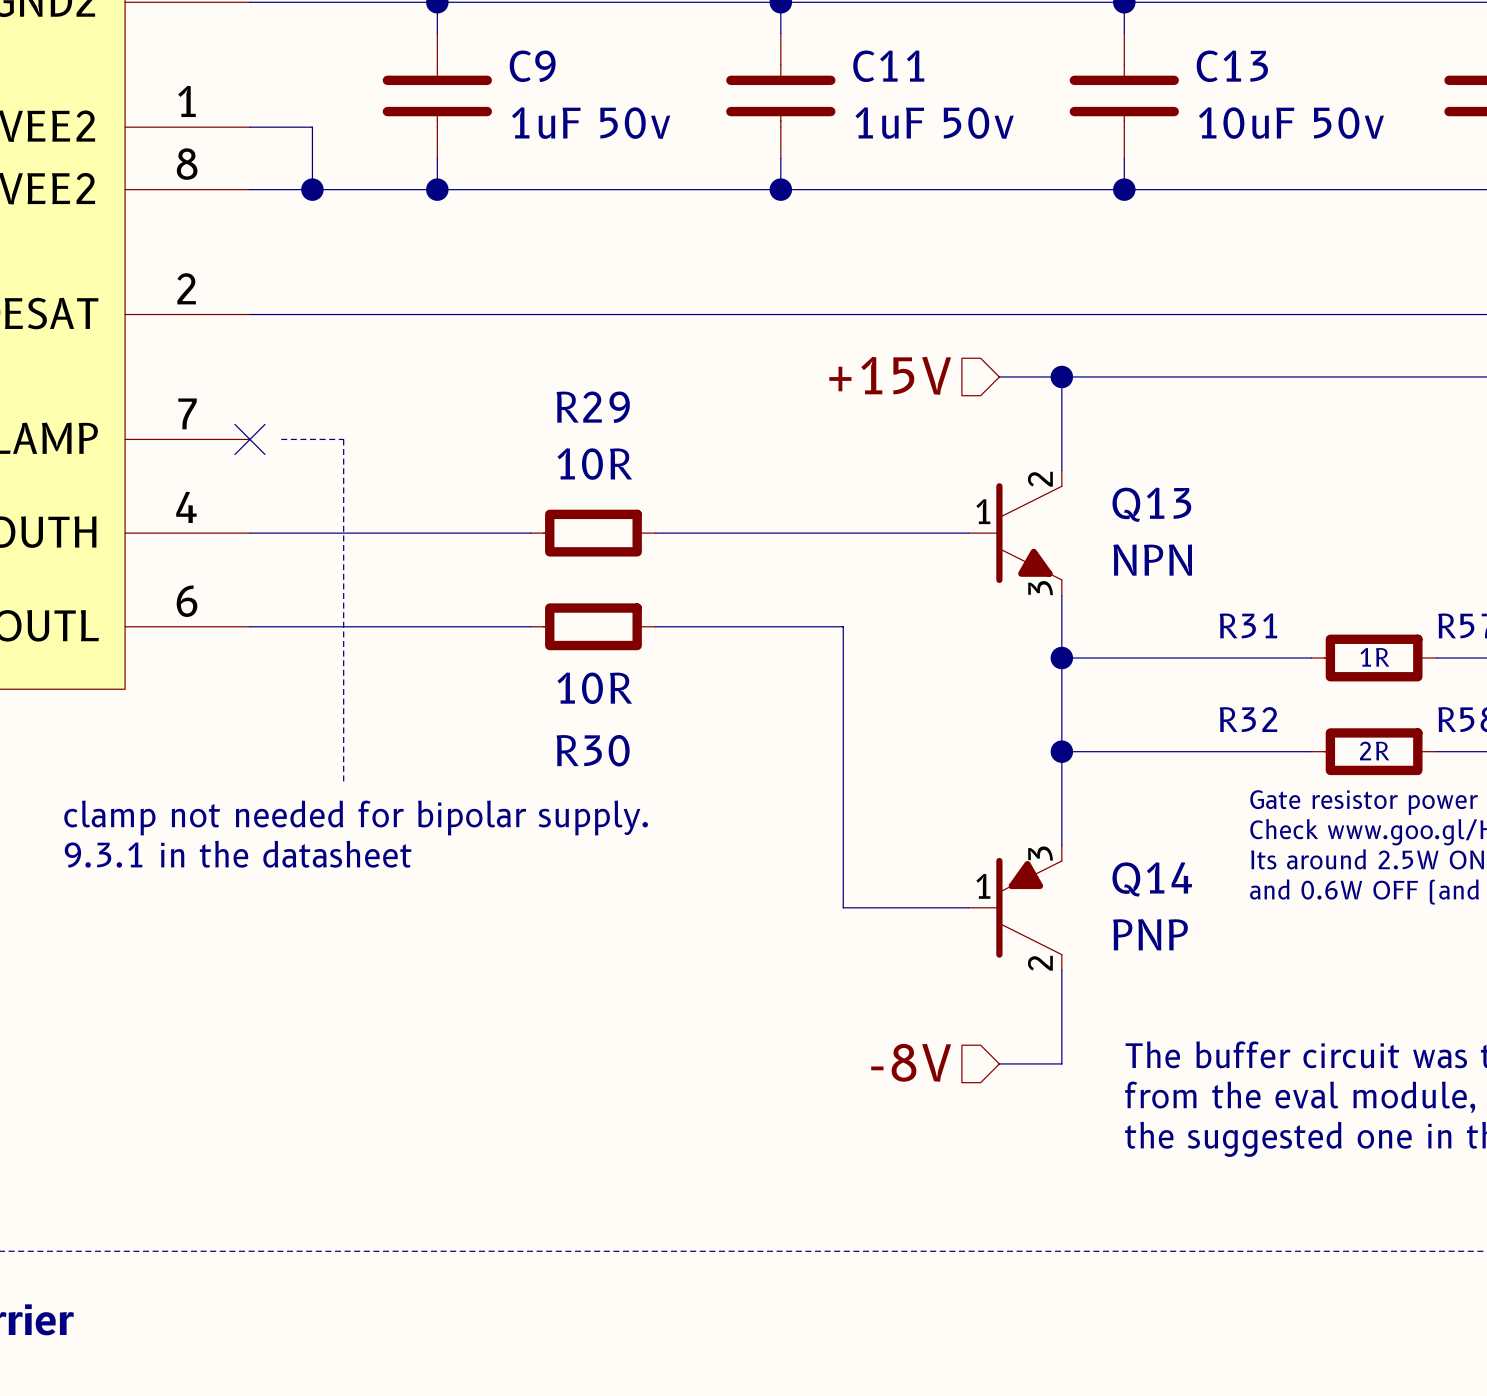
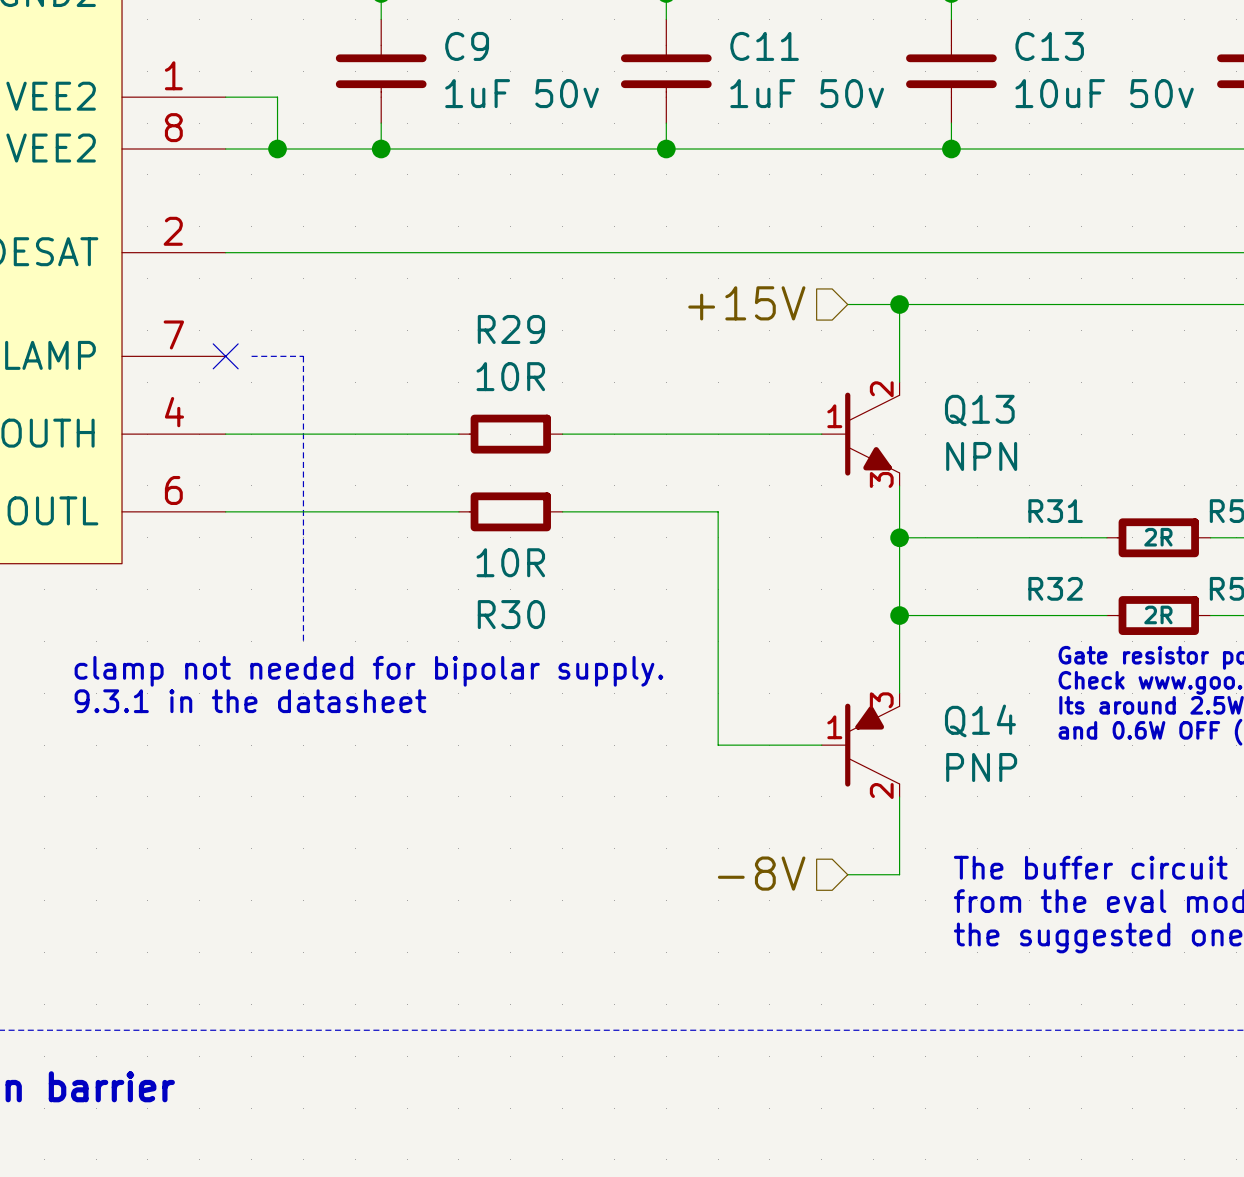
R31 value: 1R (1374, 657) -> 2R (1158, 537)

